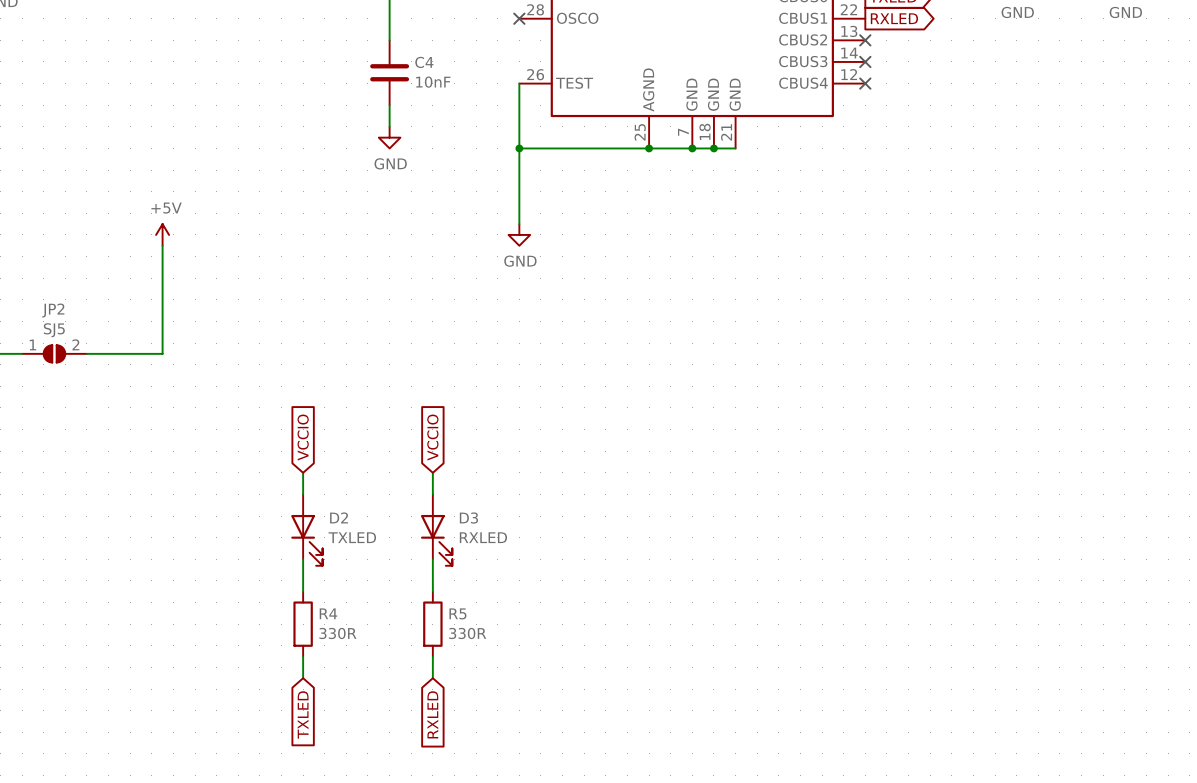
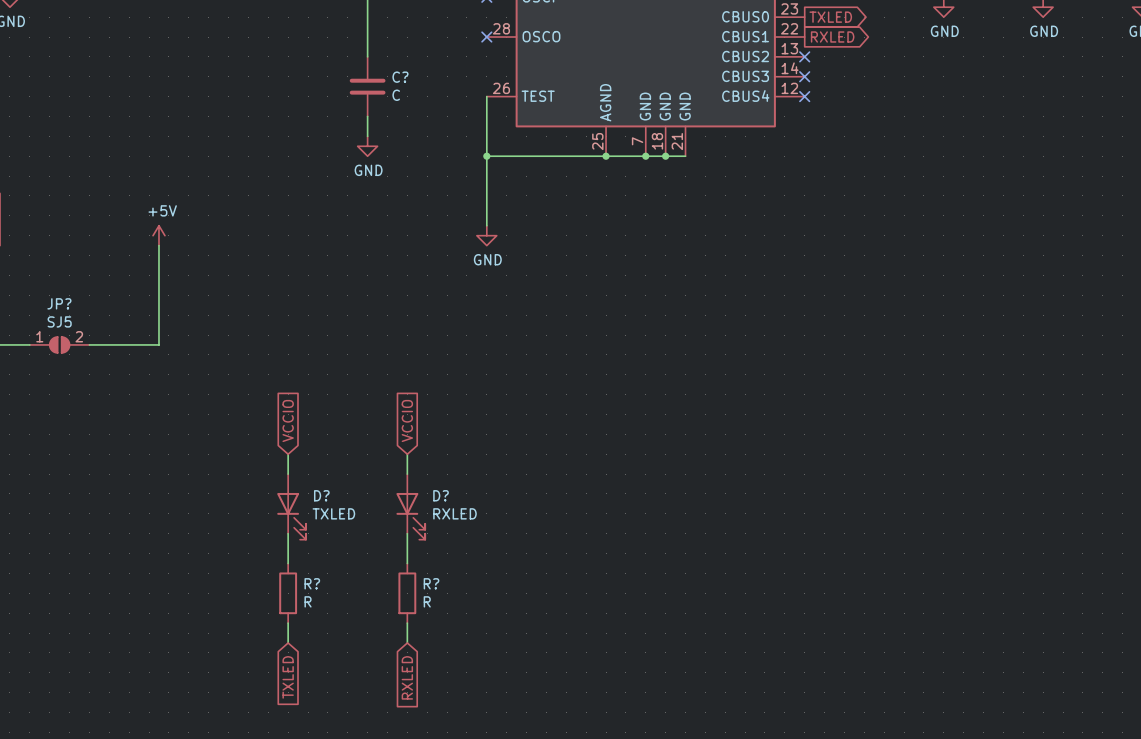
C4 name: C4 (424, 62) -> C? (400, 77)
C4 value: 10nF (433, 82) -> C (396, 95)
JP2 name: JP2 (53, 310) -> JP? (59, 303)
D2 name: D2 (339, 517) -> D? (321, 495)
D3 name: D3 (468, 518) -> D? (441, 495)
R4 name: R4 (328, 613) -> R? (312, 583)
R5 name: R5 (457, 613) -> R? (431, 583)
R4 value: 330R (337, 633) -> R (308, 601)
R5 value: 330R (467, 633) -> R (427, 601)

